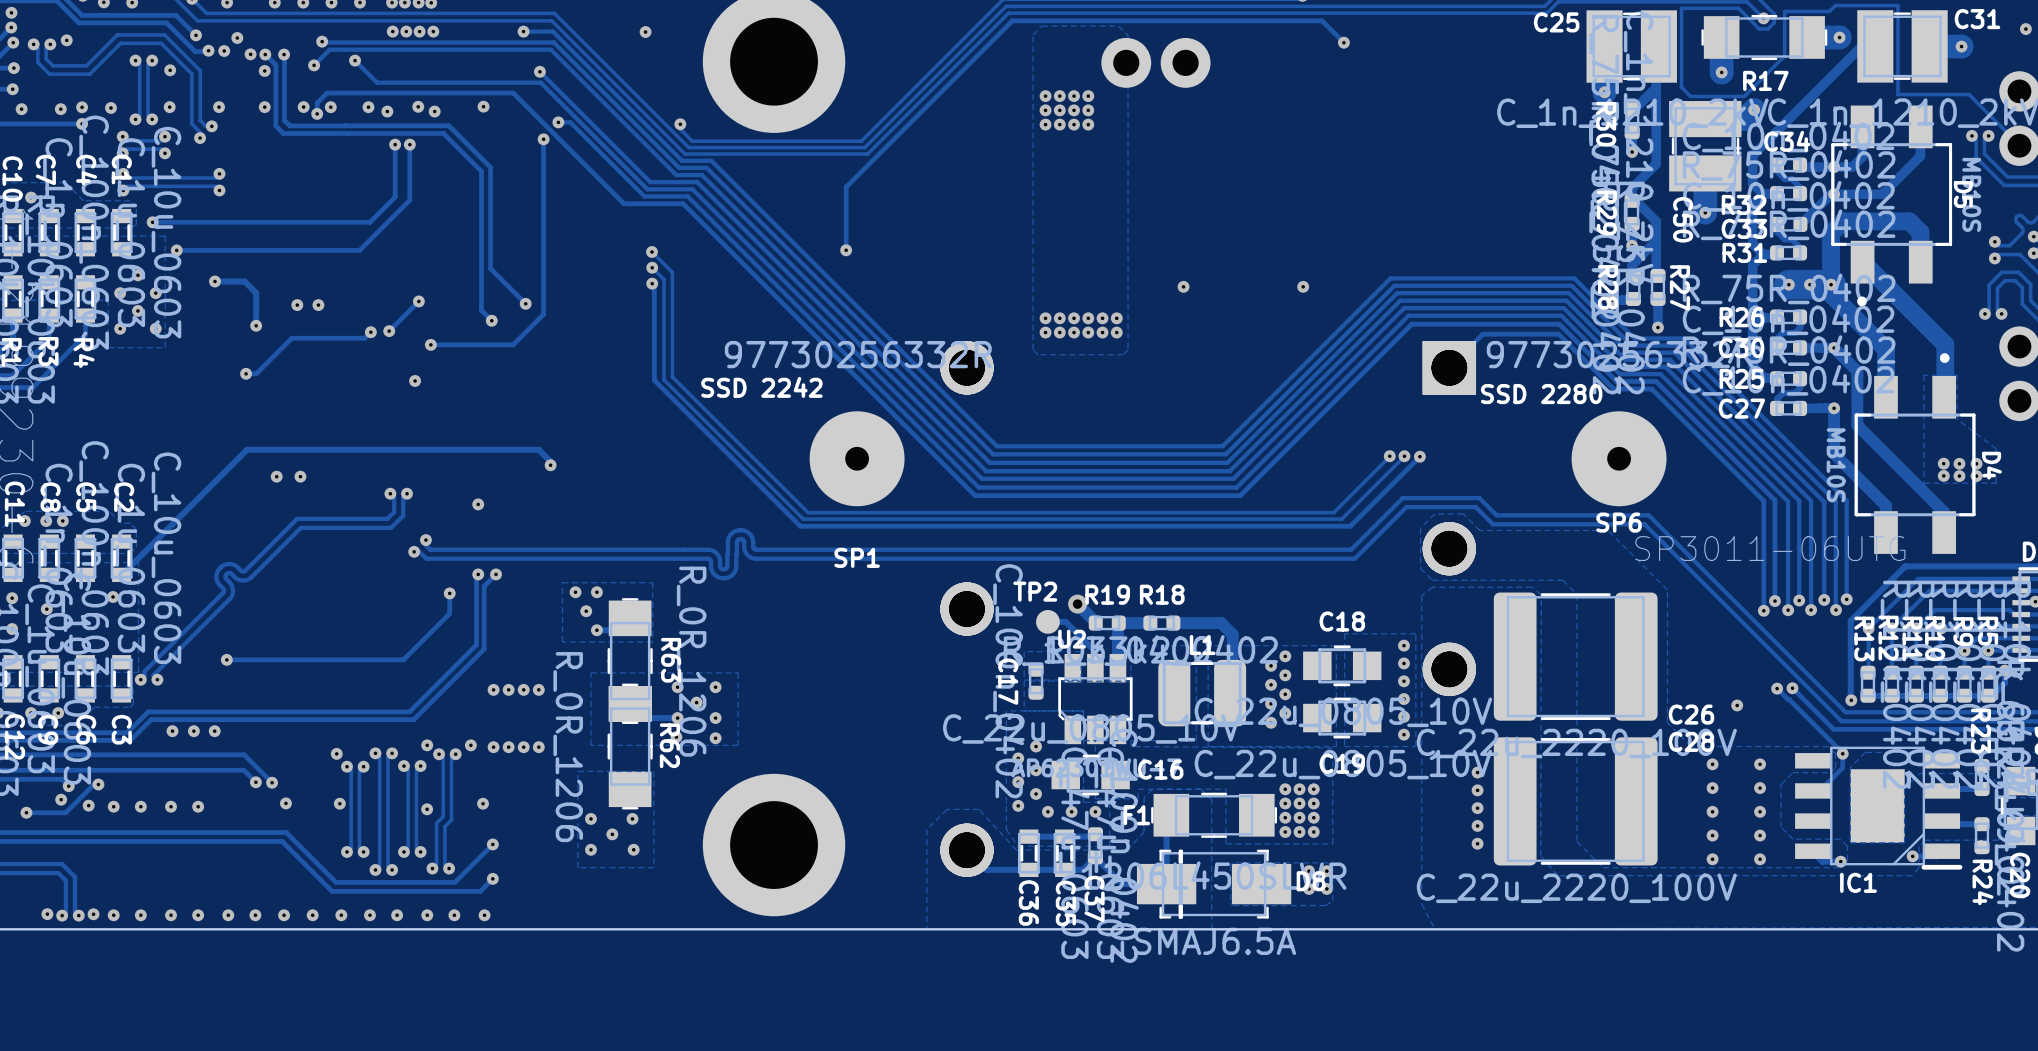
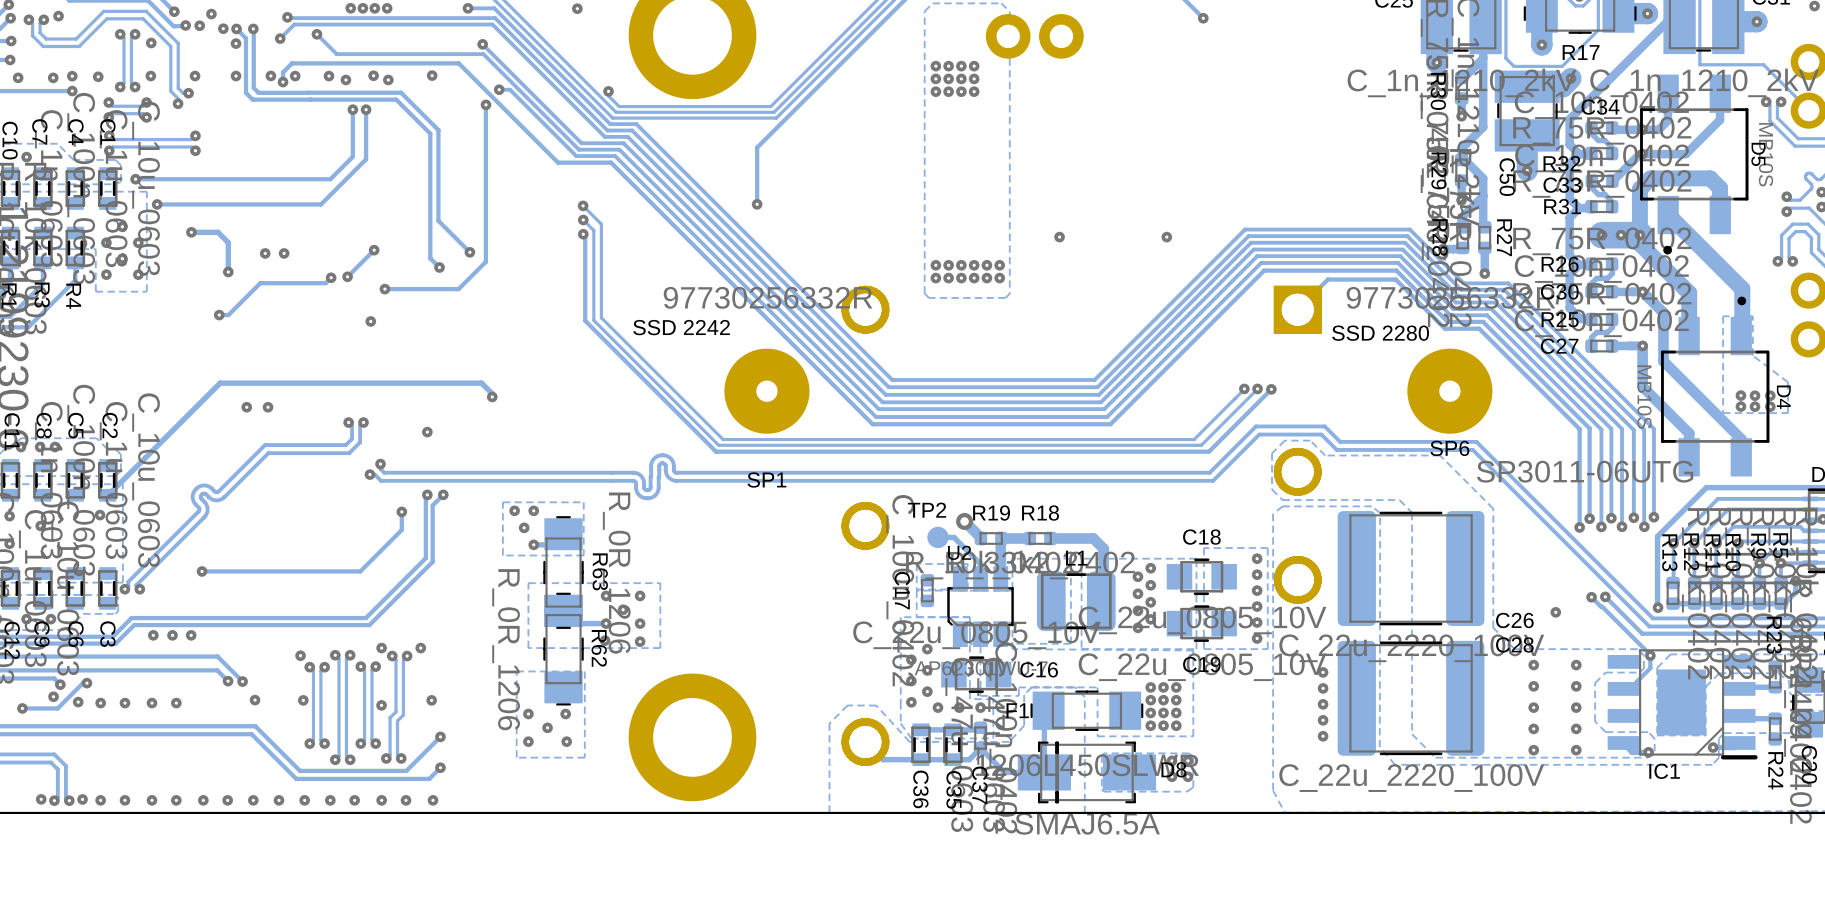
via: (493, 689) -> none
via: (508, 689) -> none
via: (523, 689) -> none
via: (538, 689) -> none
via: (493, 747) -> none
via: (508, 747) -> none
via: (523, 747) -> none
via: (538, 747) -> none

